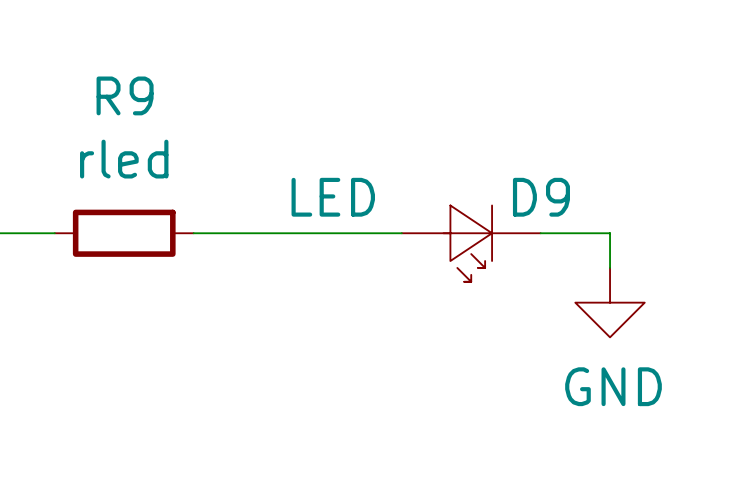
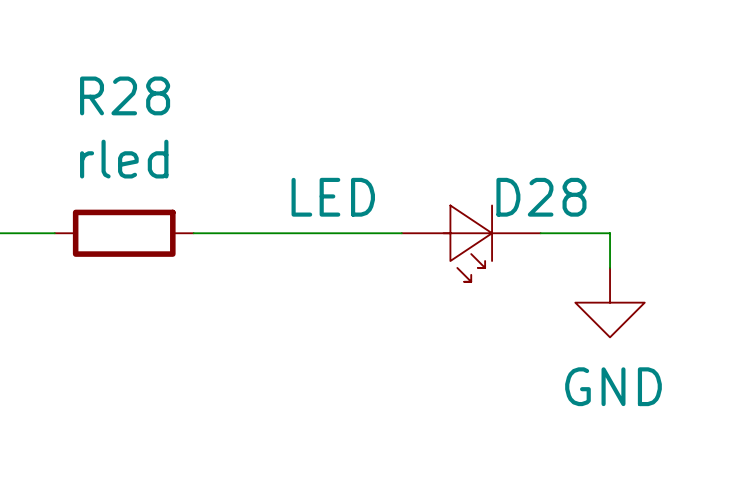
R9 name: R9 (125, 95) -> R28 (125, 95)
D9 name: D9 (541, 197) -> D28 (541, 197)

